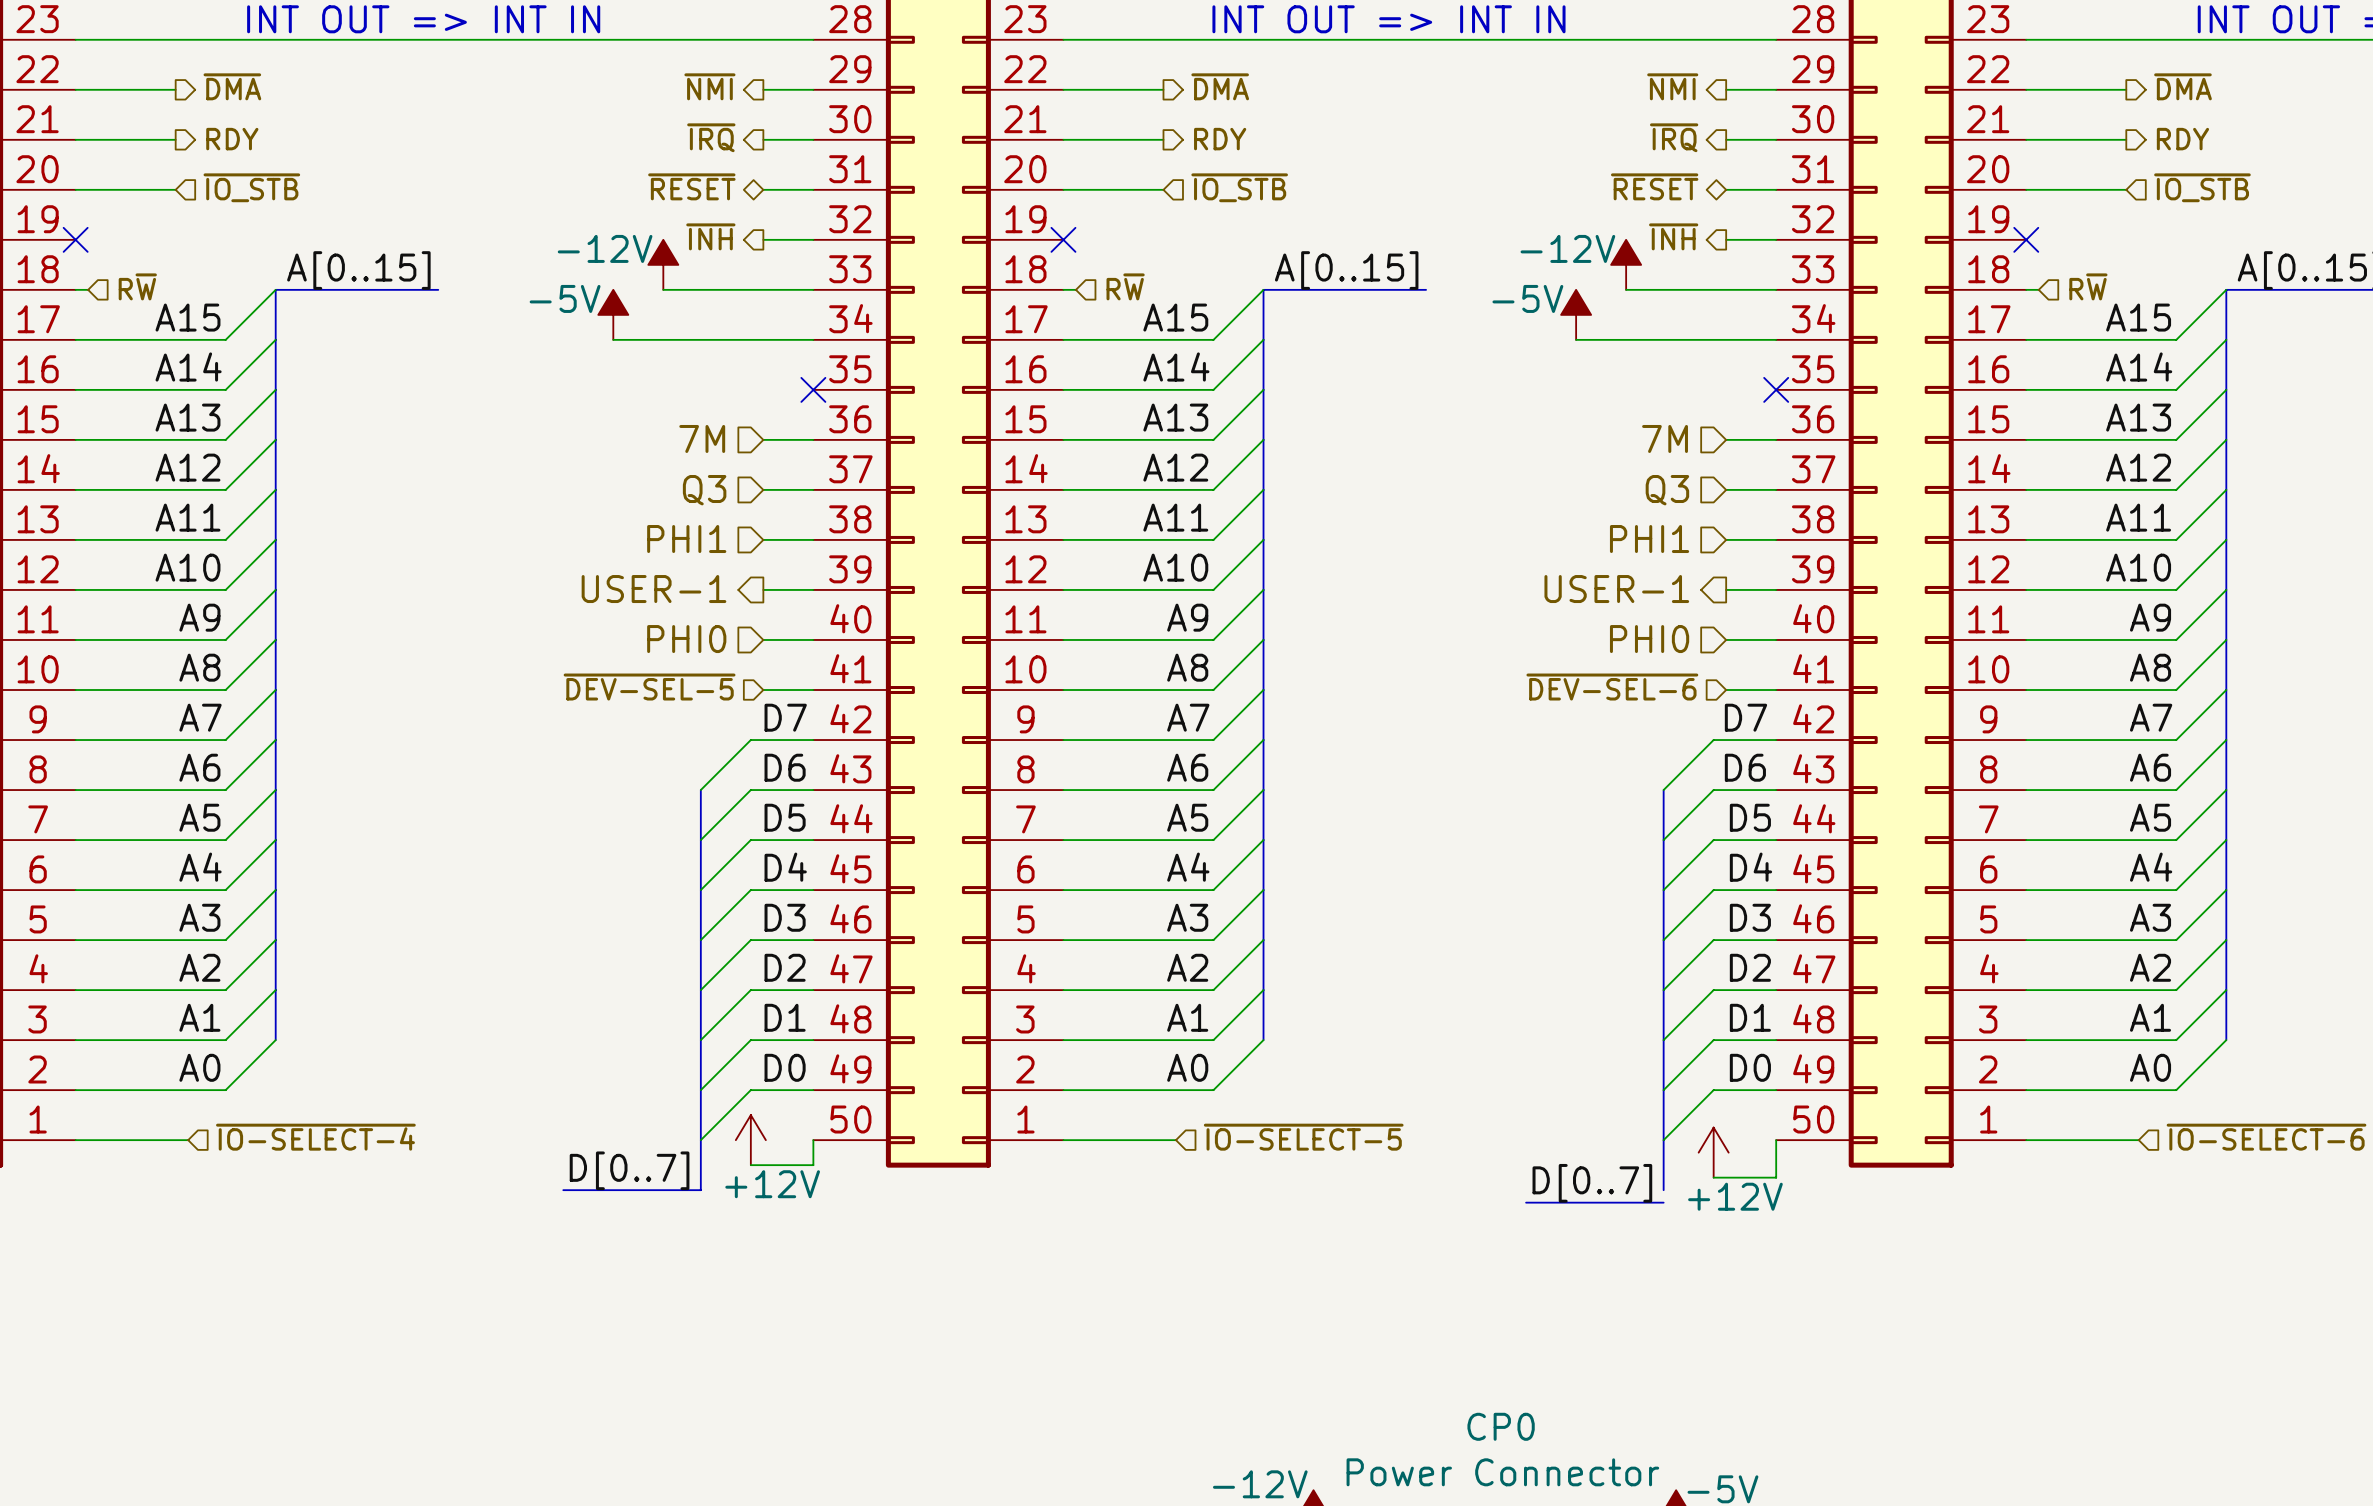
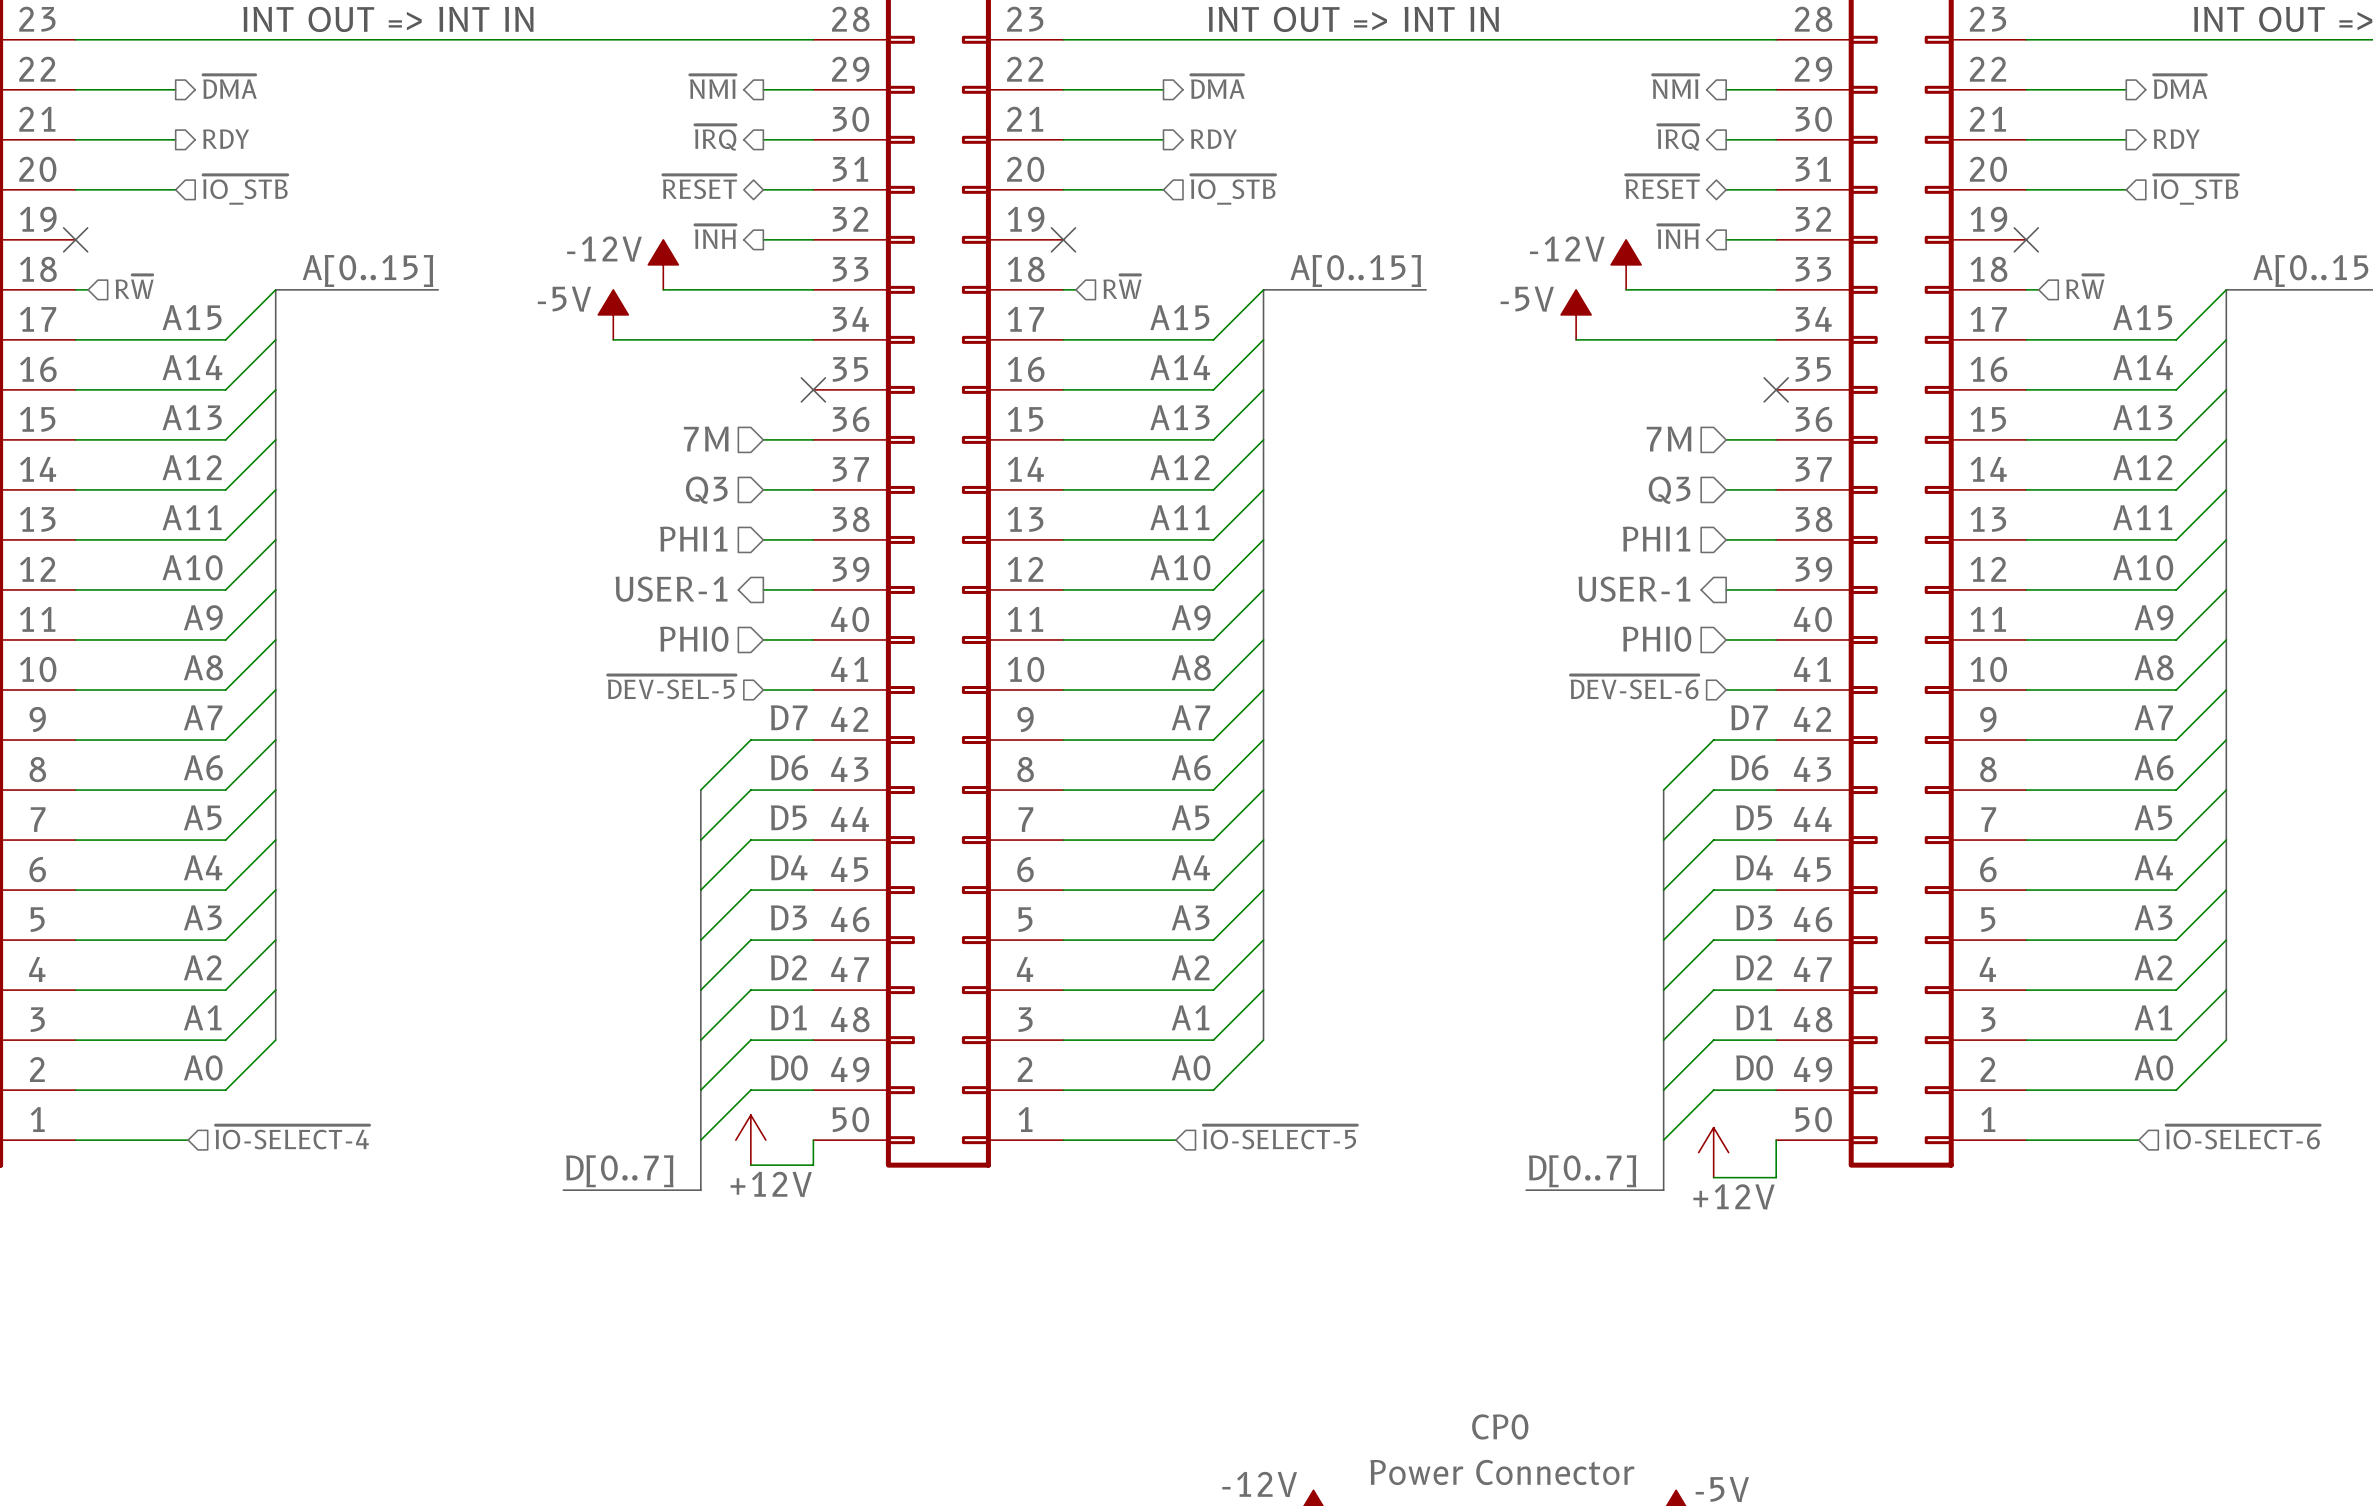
label position: D[0..7] (1592, 1183) -> D[0..7] (1582, 1171)
bus: (1526, 1202) (1663, 1202) -> (1526, 1190) (1663, 1190)

